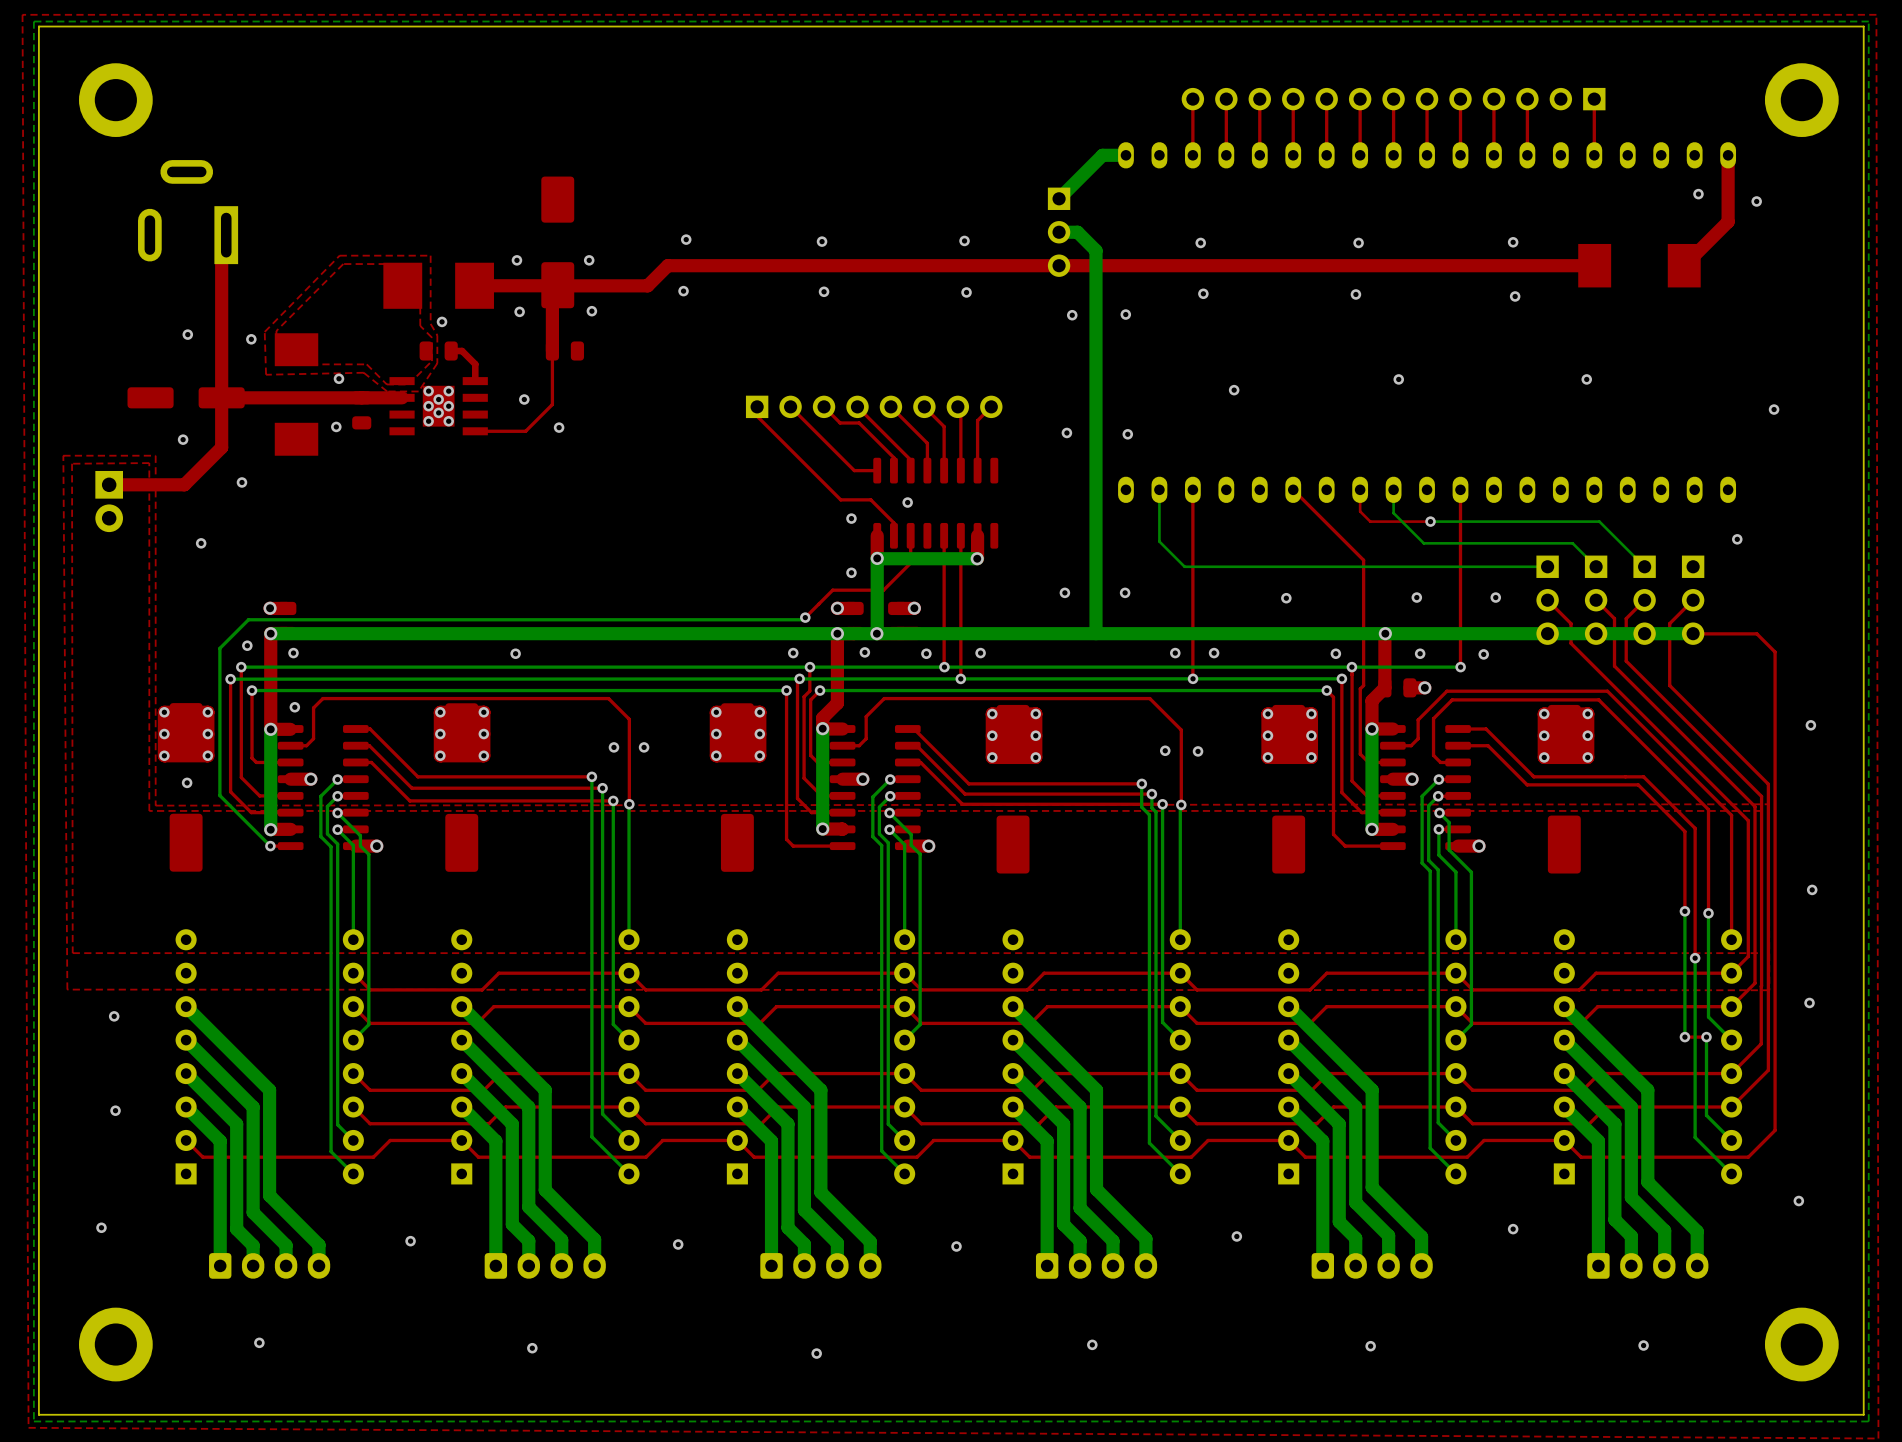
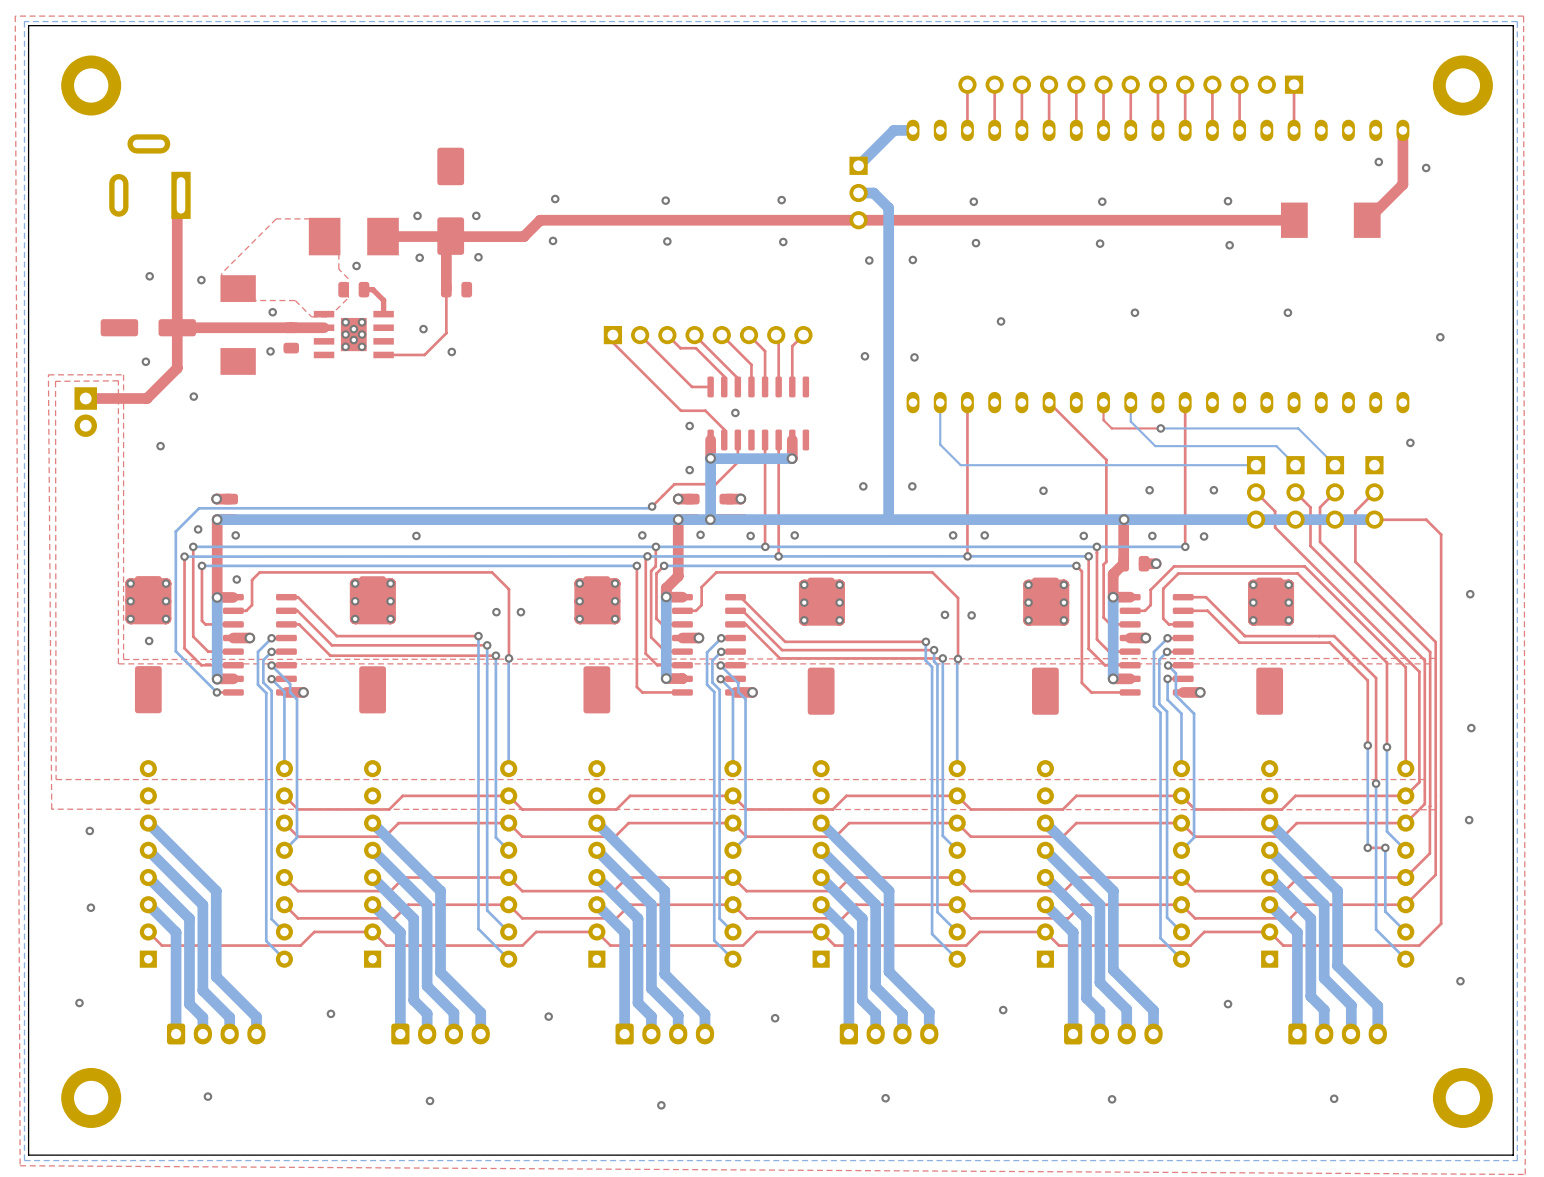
top zone outline: (430, 255) (430, 323) (437, 335) (437, 363) (418, 391) (387, 391) (363, 372) (266, 374) (264, 331) (339, 255) (430, 255) -> none

